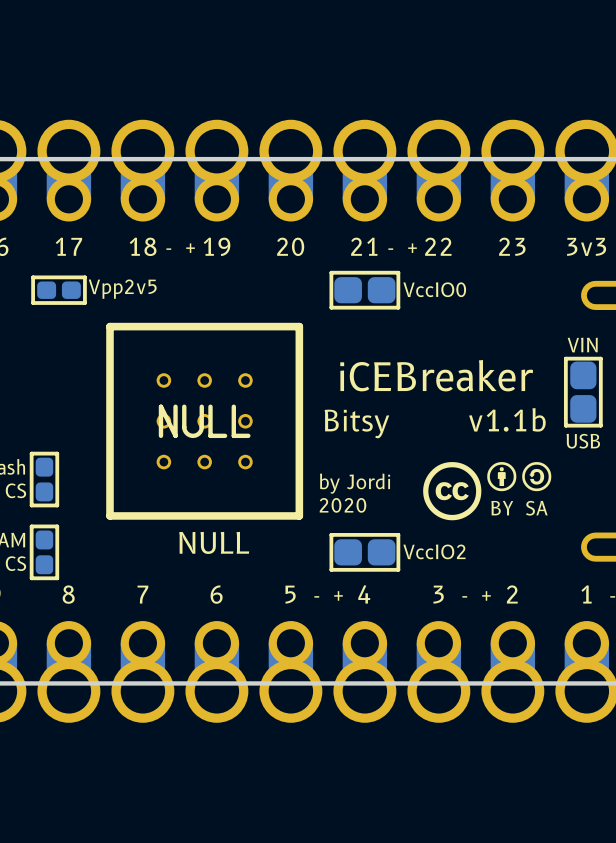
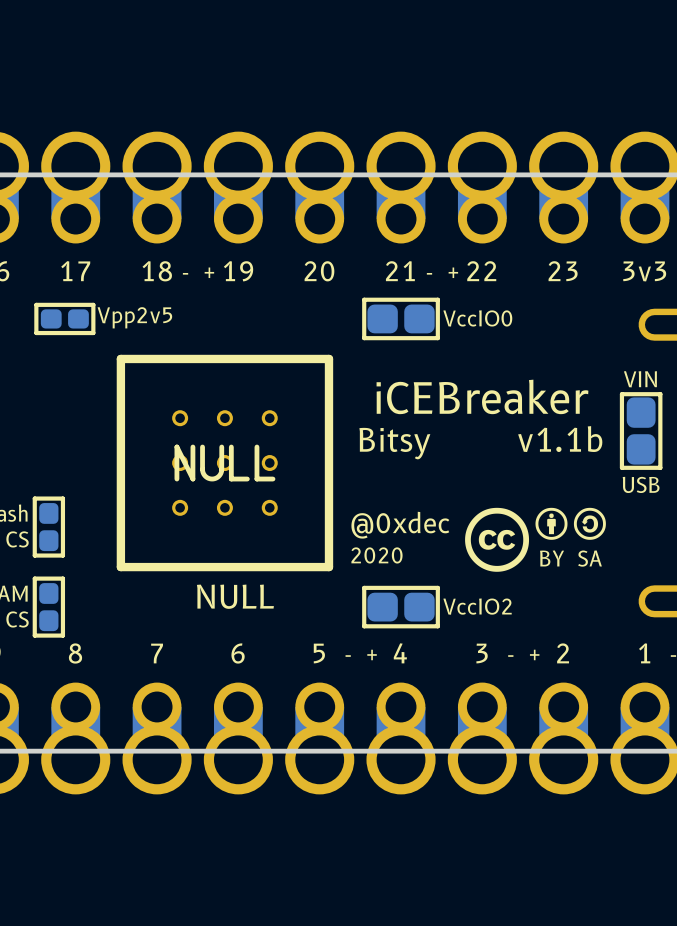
text position: iCEBreaker (436, 375) -> iCEBreaker (482, 396)
text position: v1.1b (507, 419) -> v1.1b (560, 439)
text position: Bitsy (356, 423) -> Bitsy (394, 443)
text: by Jordi (355, 483) -> @0xdec (400, 525)

